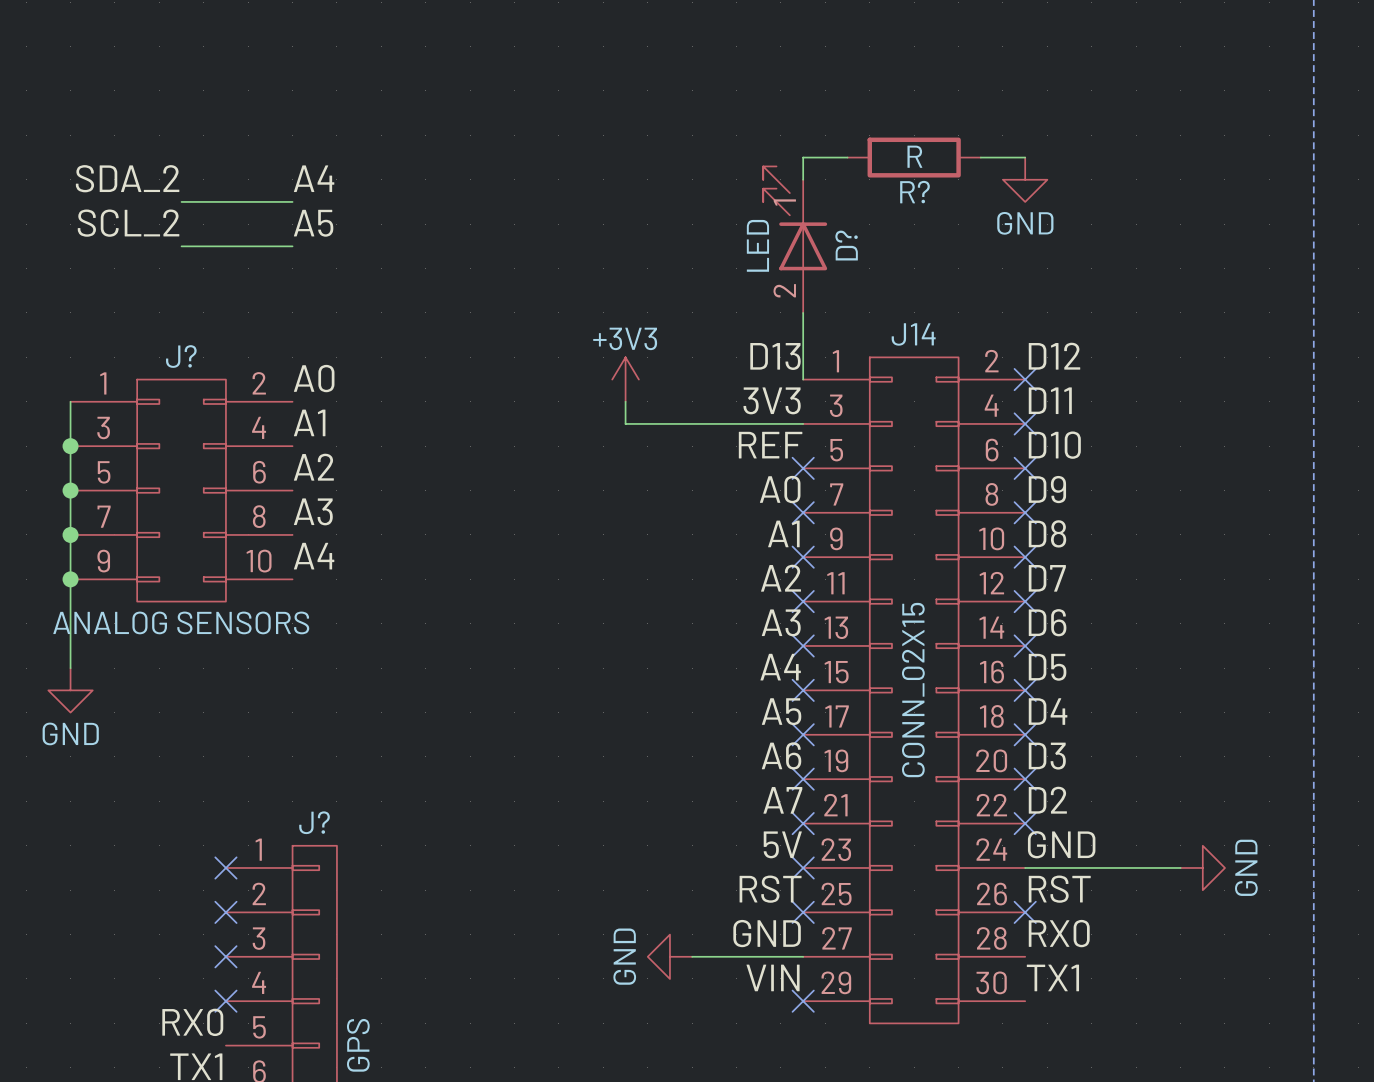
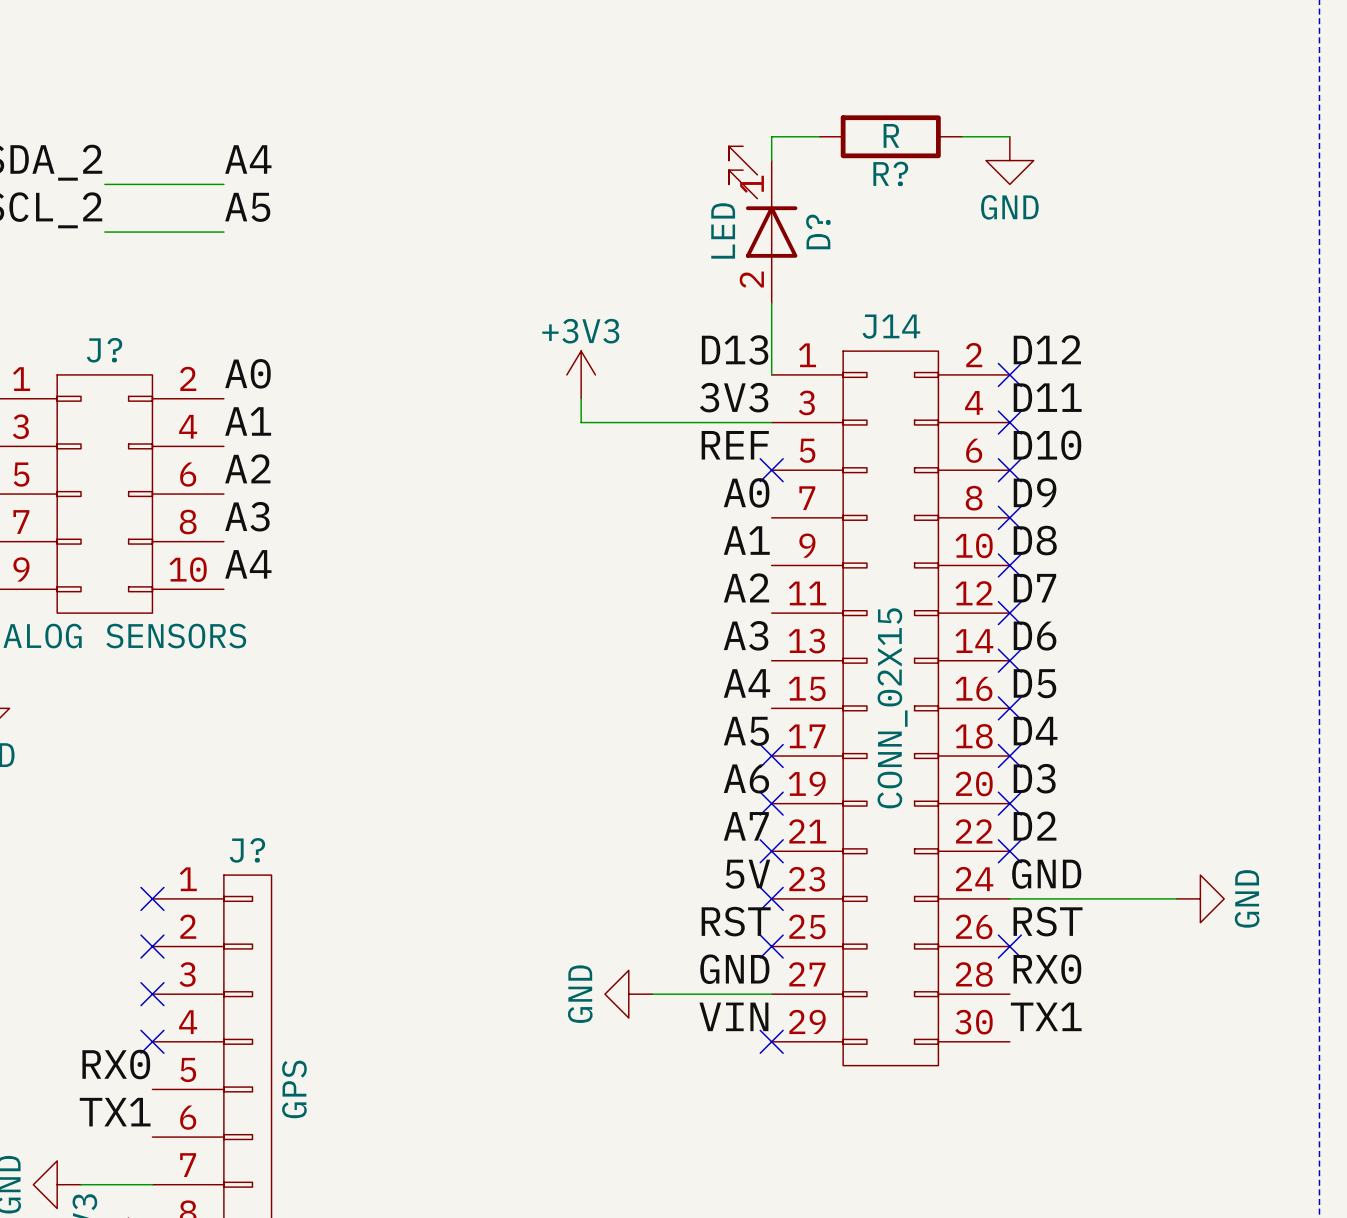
no-connect mark: (803, 512) -> none
no-connect mark: (803, 557) -> none
no-connect mark: (803, 601) -> none
no-connect mark: (803, 645) -> none
no-connect mark: (803, 690) -> none

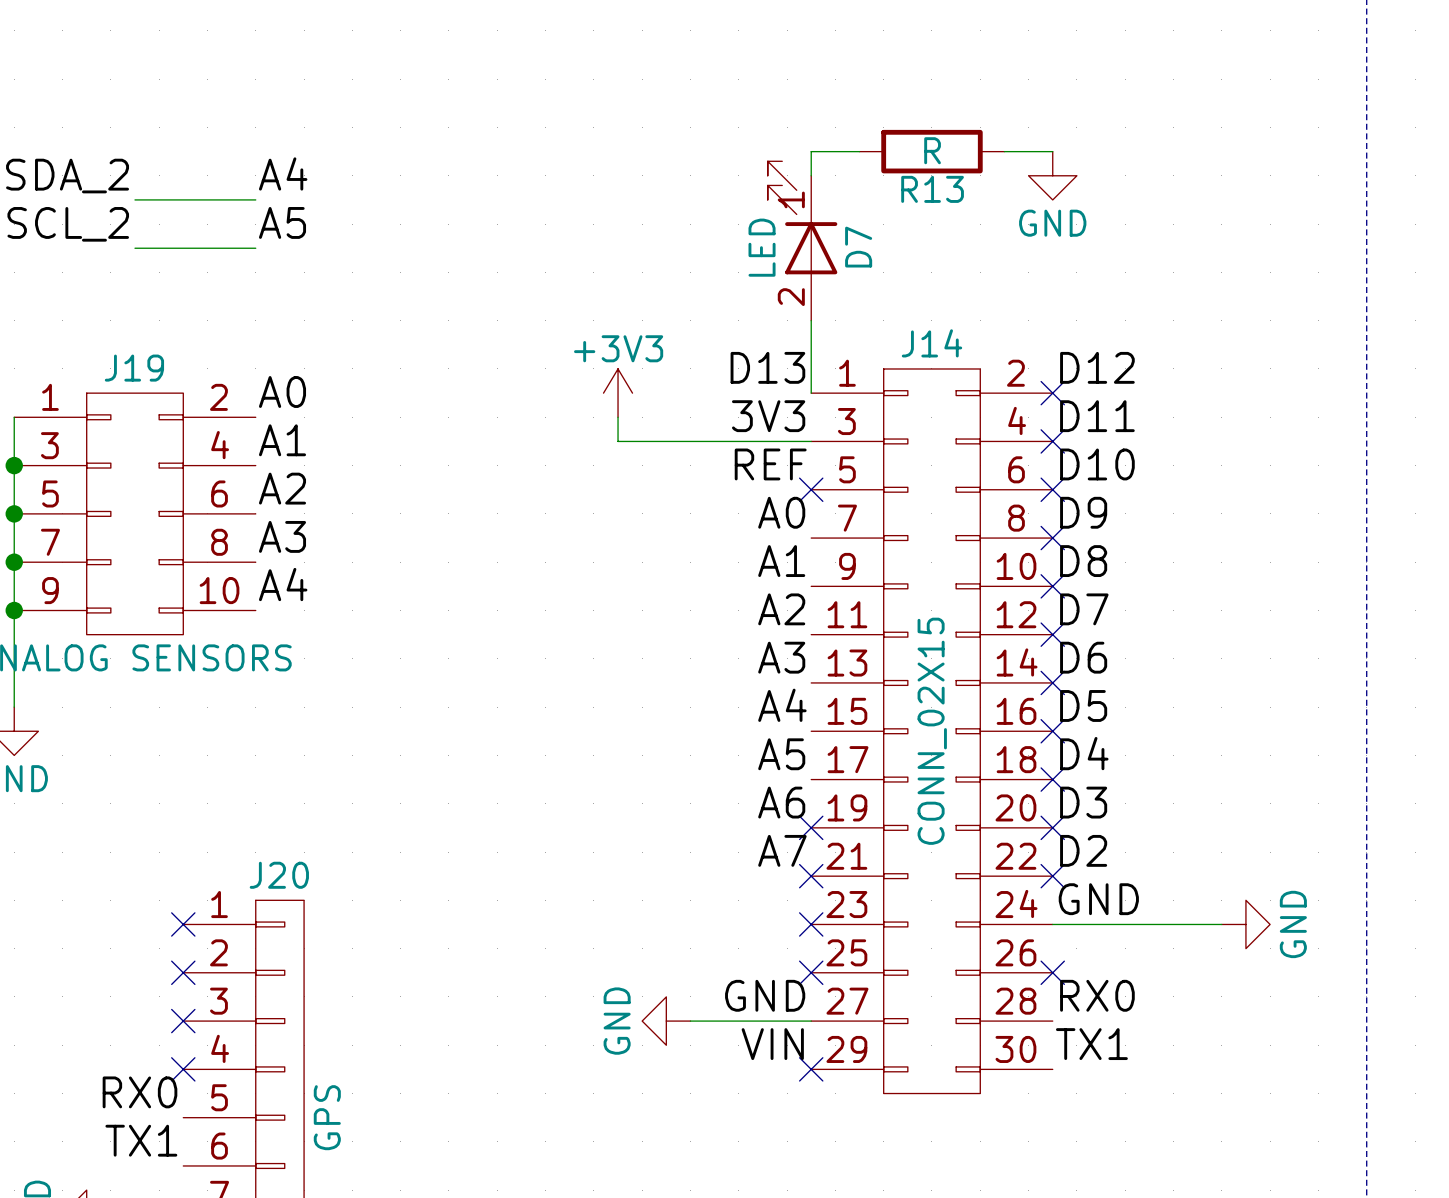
R? name: R? (890, 173) -> R13 (932, 189)
D? name: D? (818, 231) -> D7 (858, 247)
J? name: J? (104, 350) -> J19 (134, 368)
no-connect mark: (771, 756) -> none
J? name: J? (247, 850) -> J20 (279, 875)
label: 5V (747, 874) -> none
label: RST (736, 921) -> none
label: RST (1048, 921) -> none

